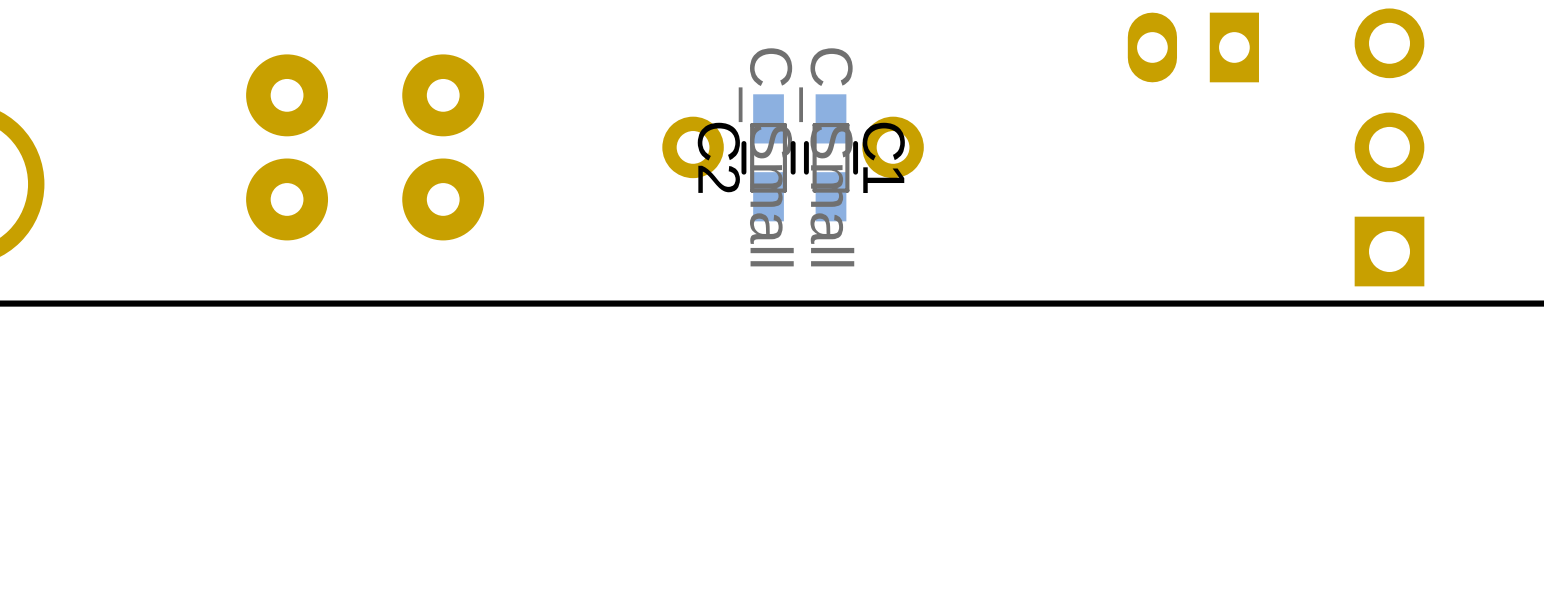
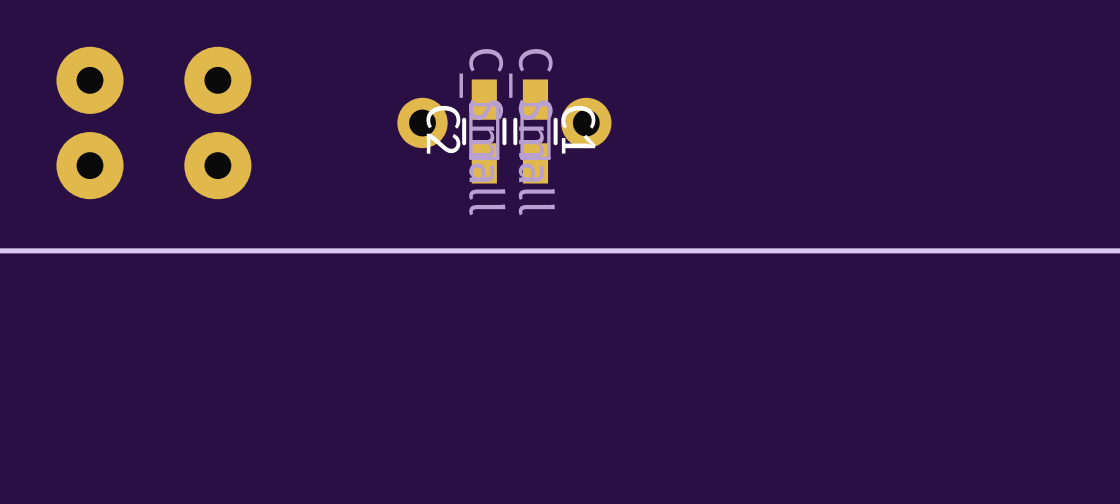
part: (1193, 47) -> none
part: (1389, 147) -> none

